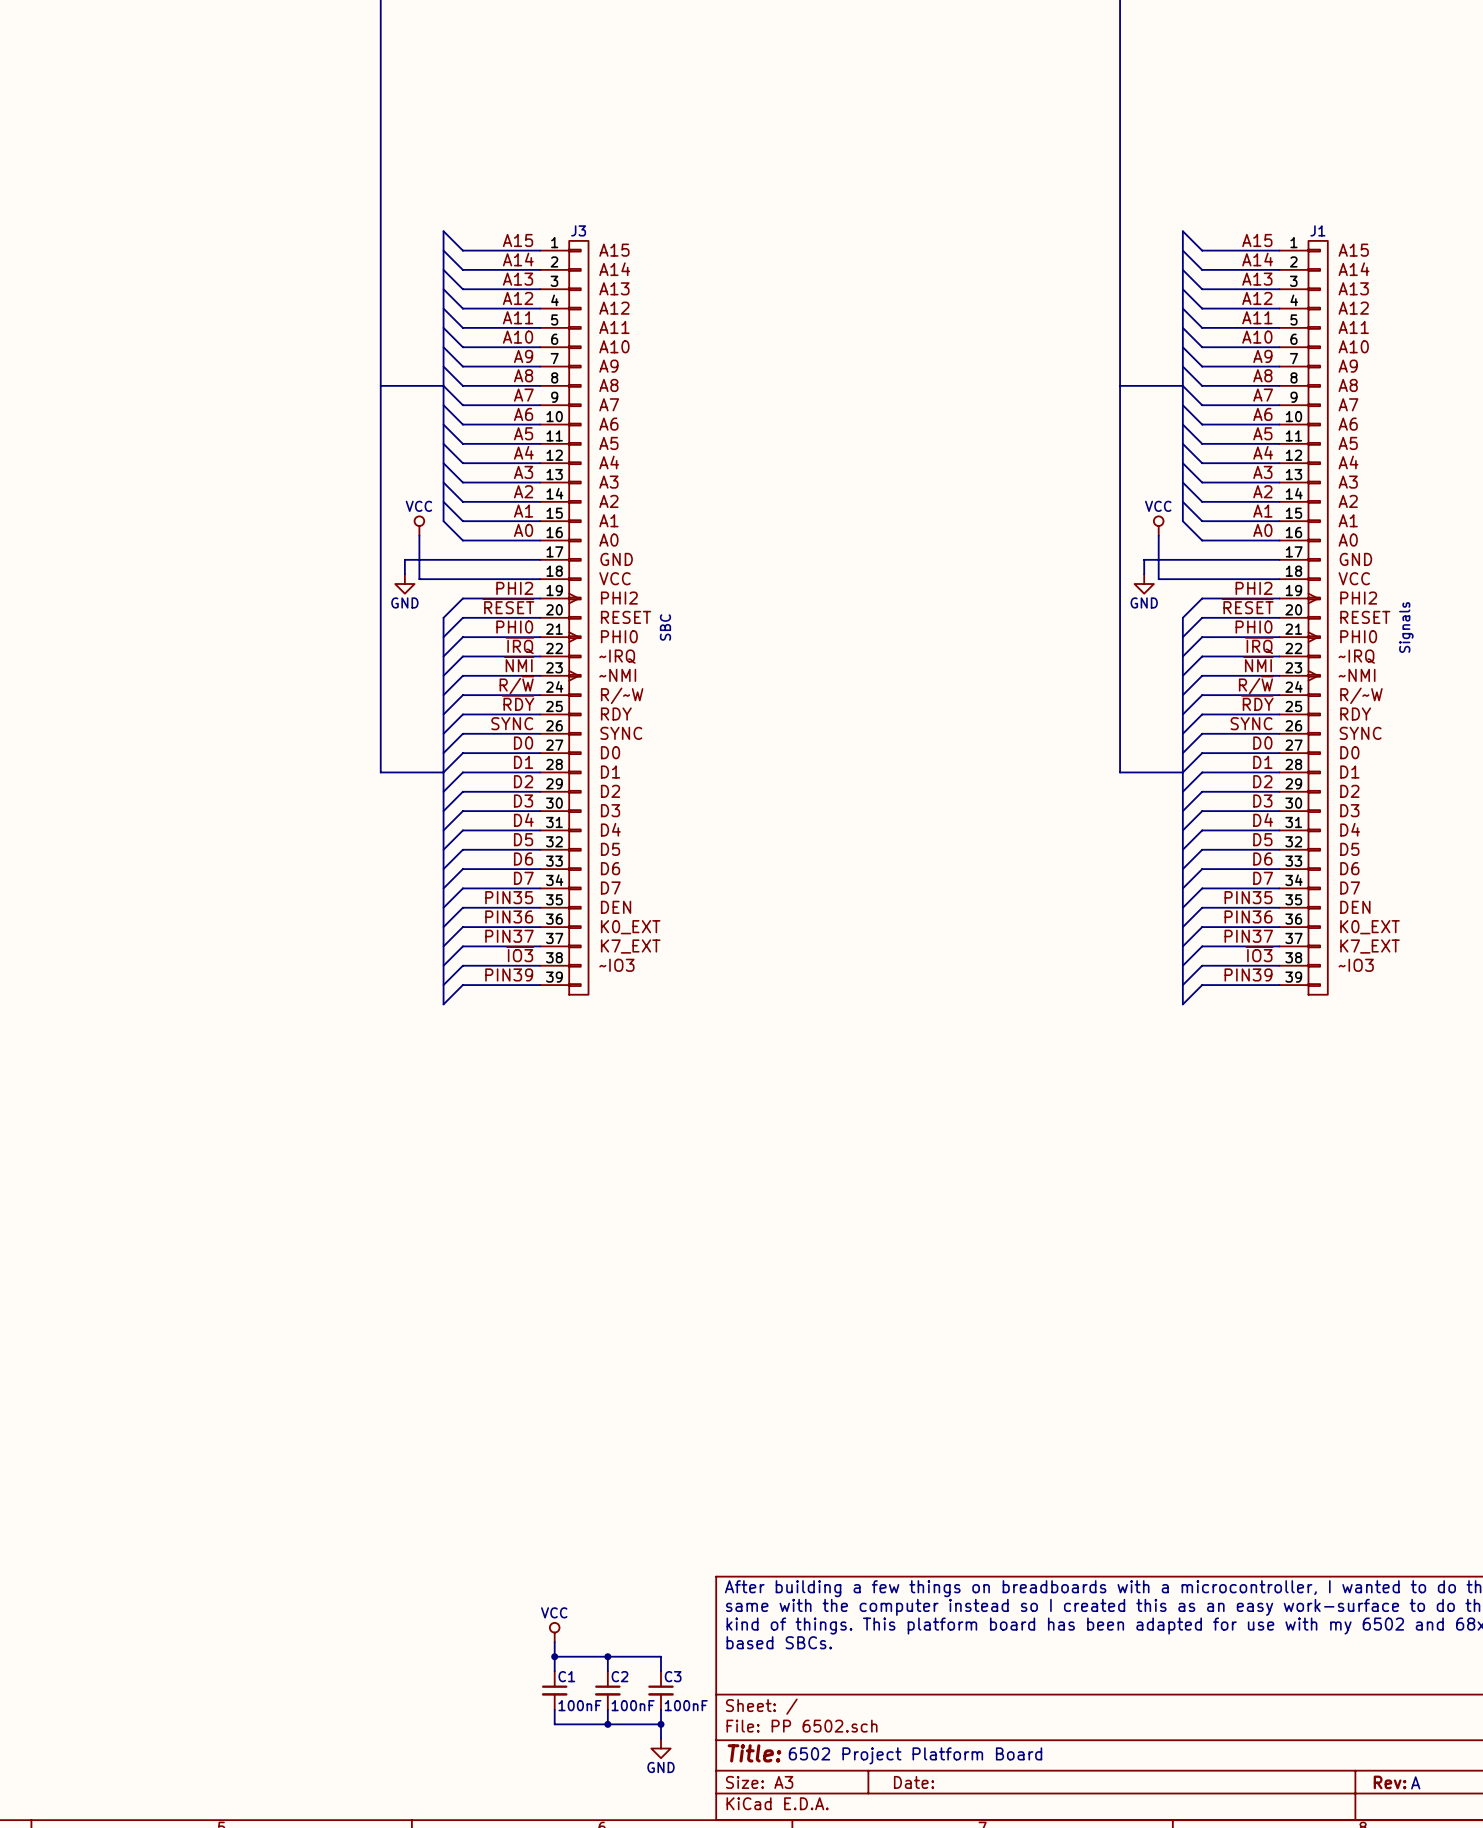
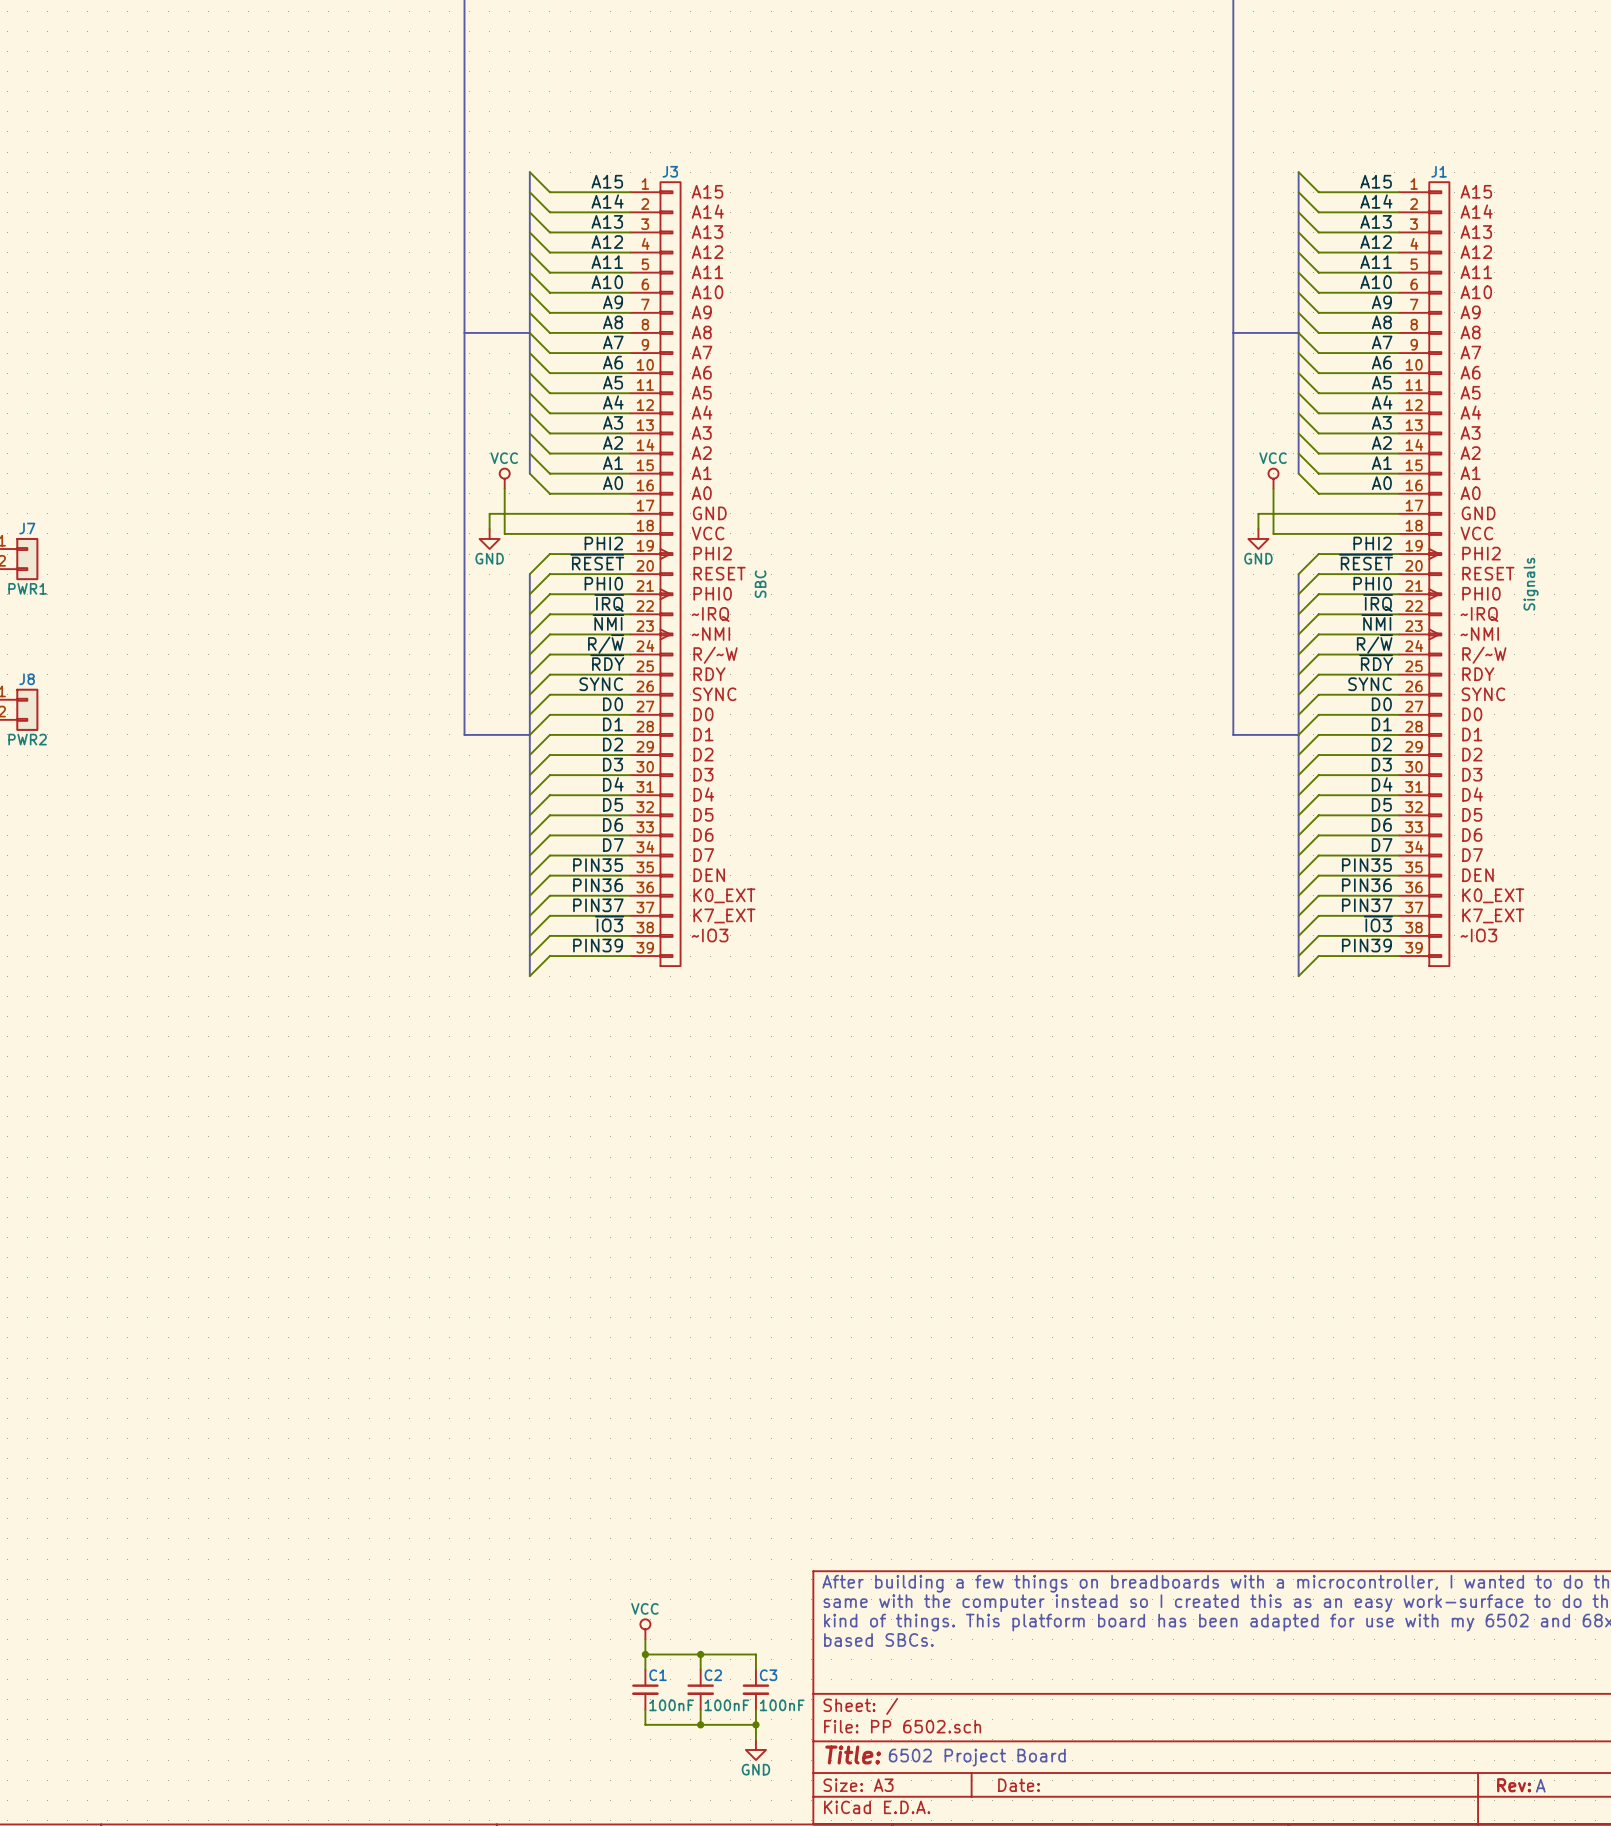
text: 6502 Project Platform Board (915, 1755) -> 6502 Project Board (977, 1757)

